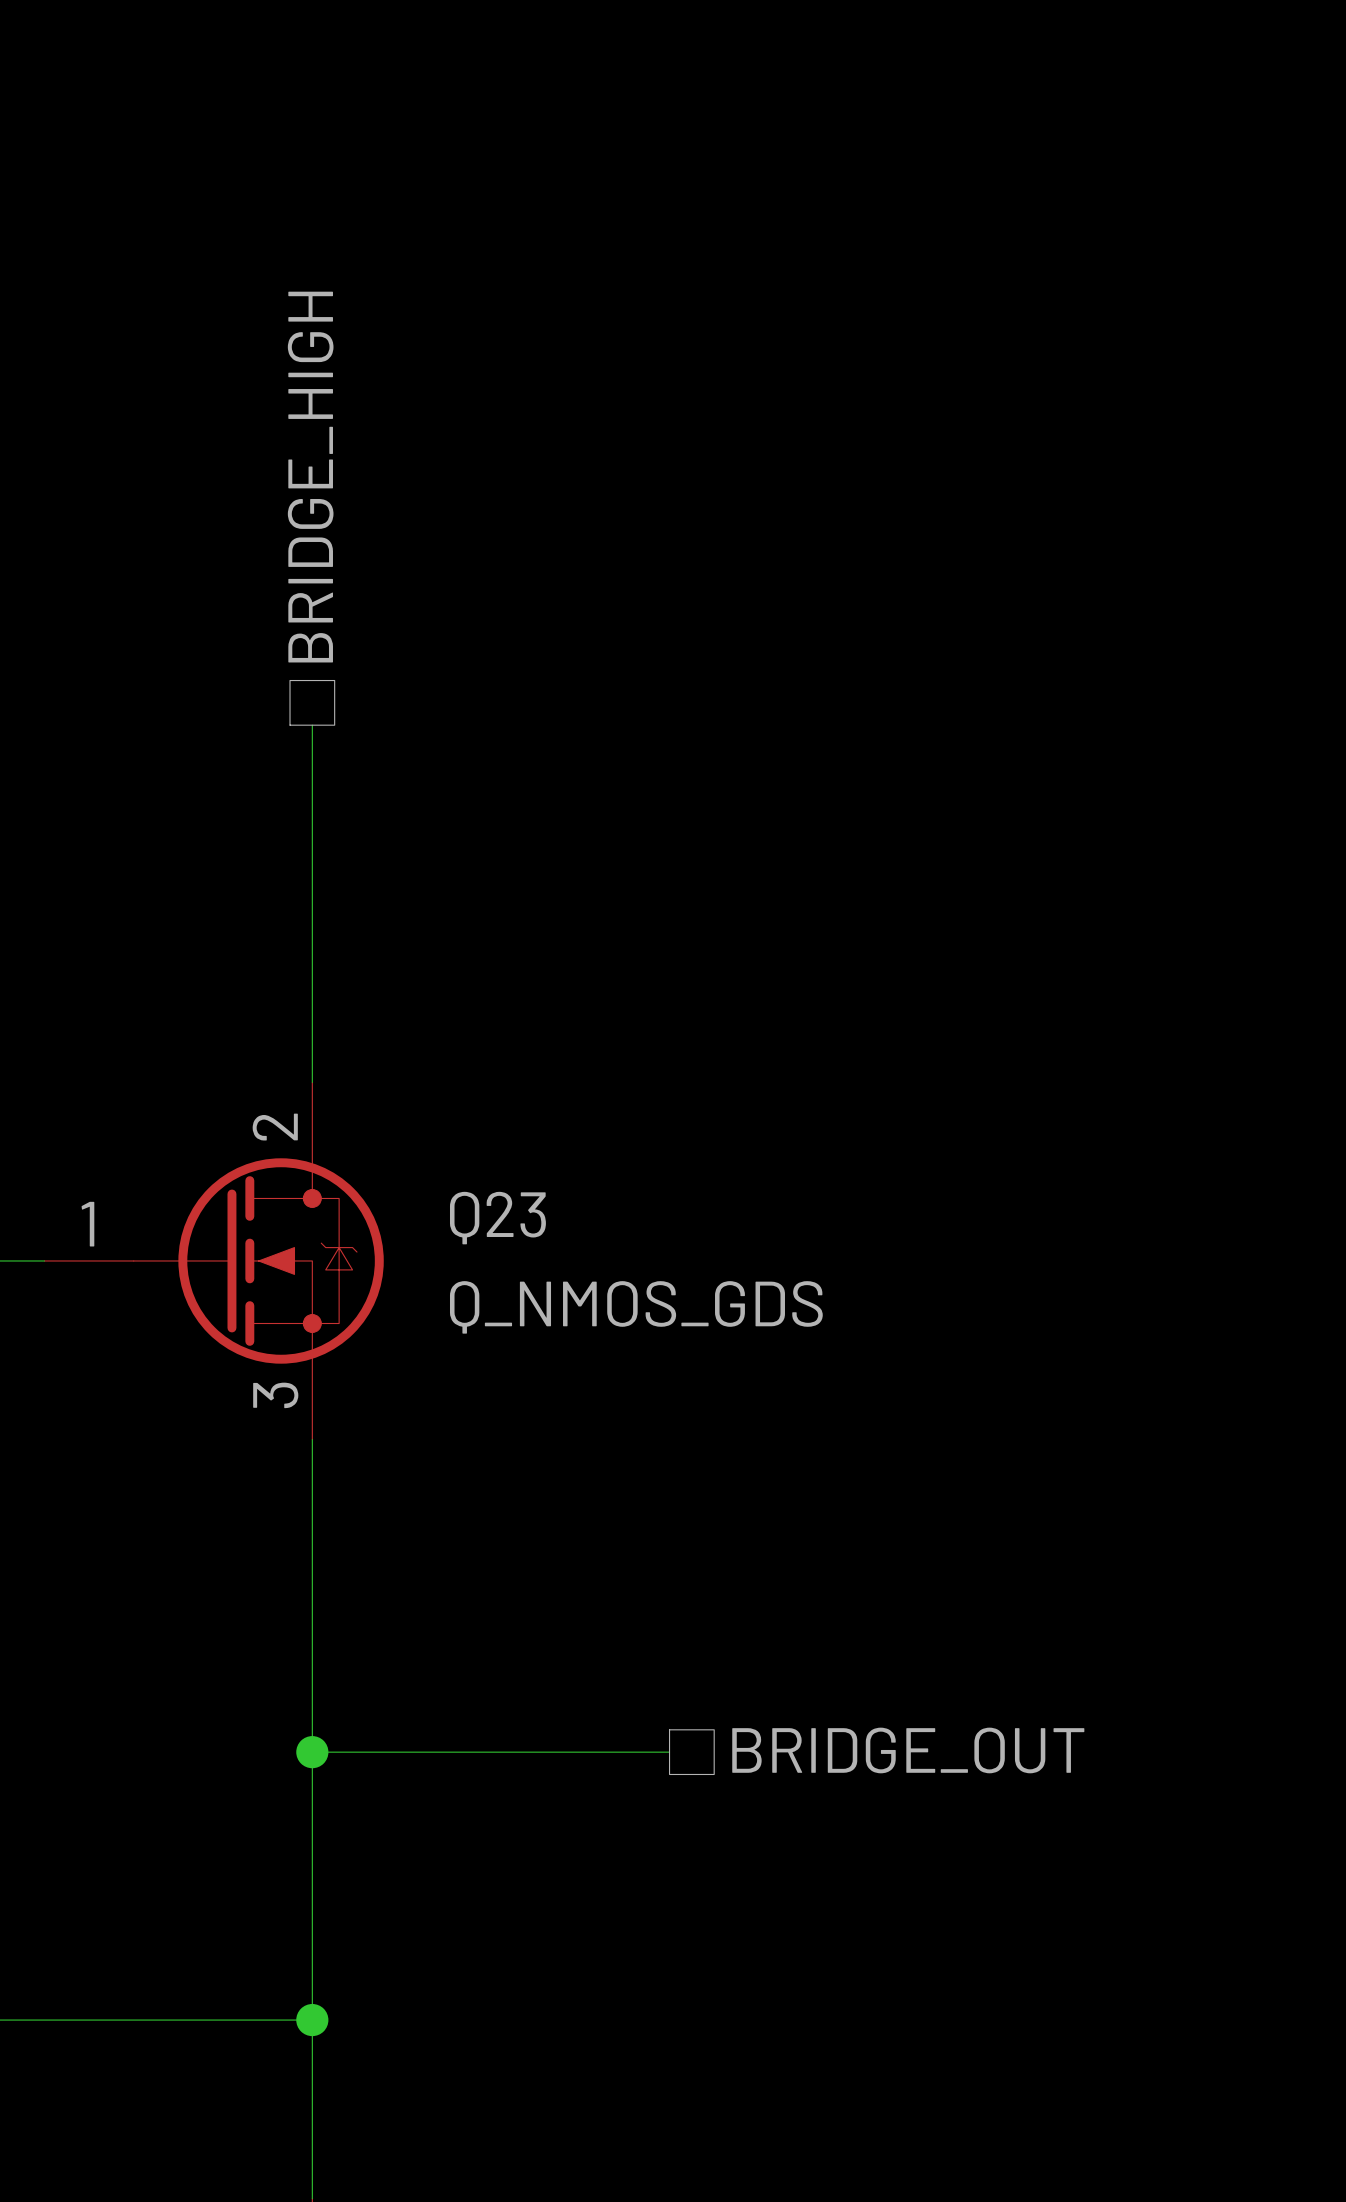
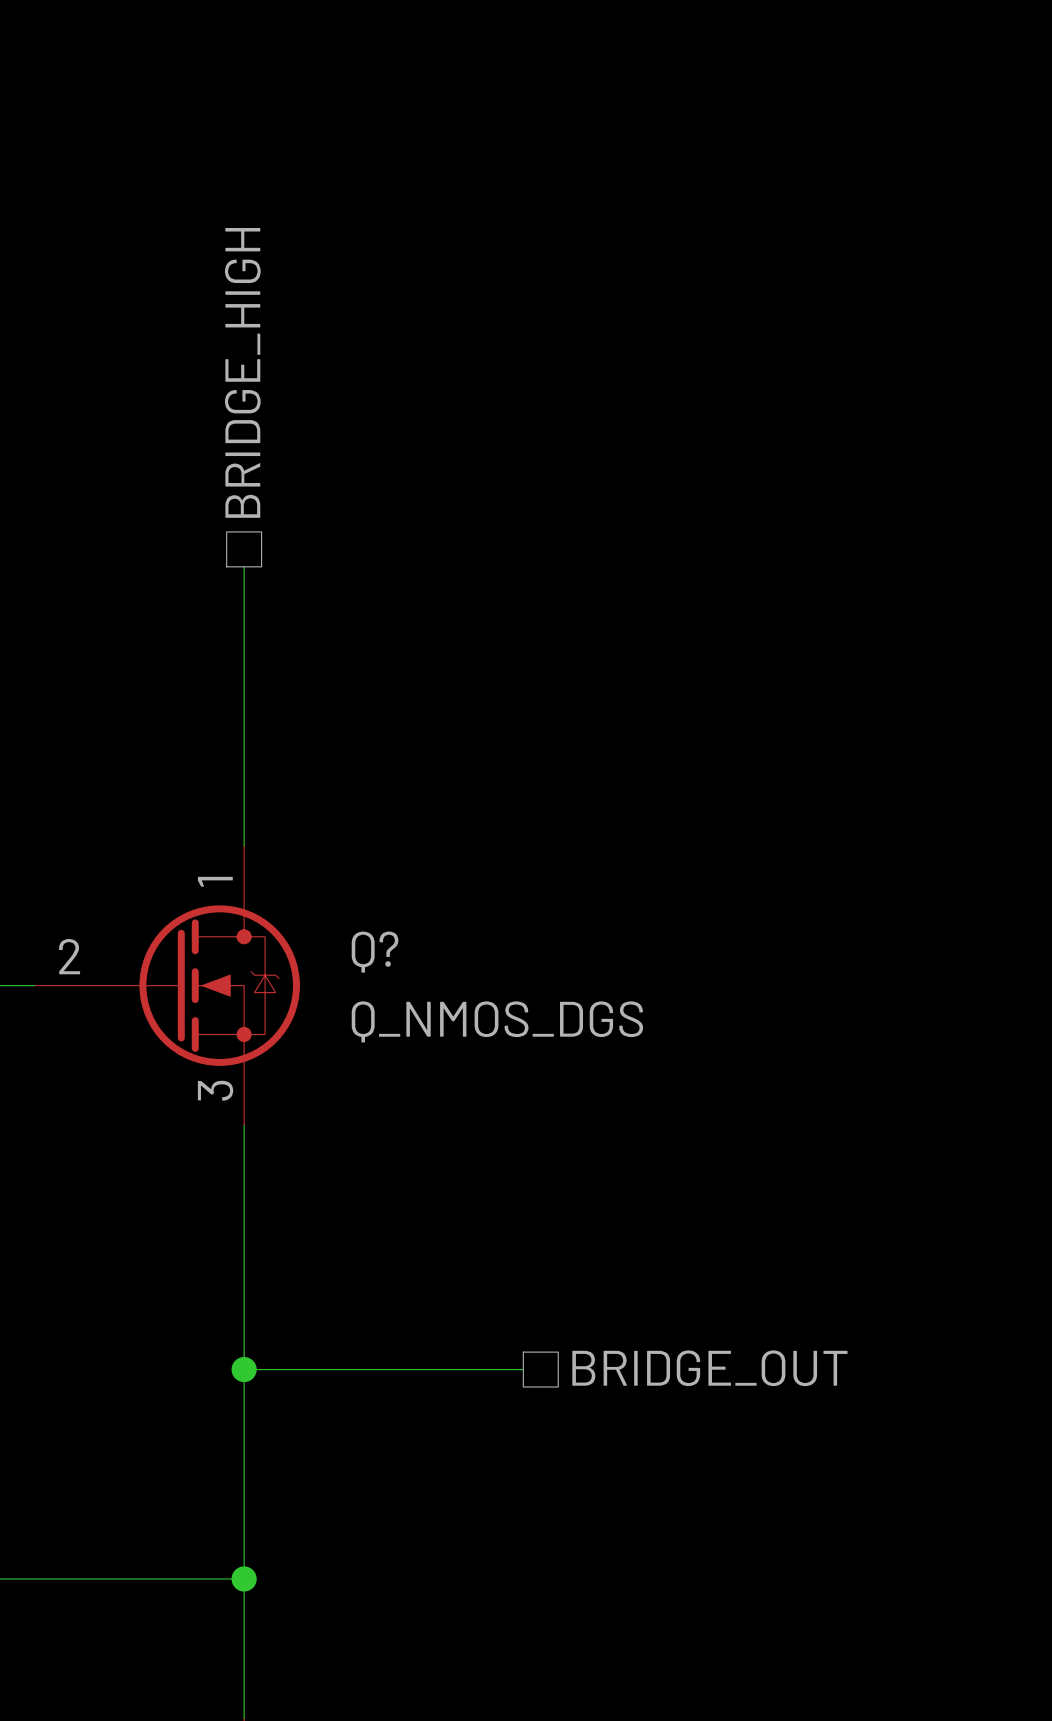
Q23 pin number: 2 (275, 1127) -> 1 (215, 881)
Q23 name: Q23 (497, 1218) -> Q? (375, 952)
Q23 pin number: 1 (87, 1224) -> 2 (69, 956)
Q23 value: Q_NMOS_GDS (636, 1307) -> Q_NMOS_DGS (497, 1021)

